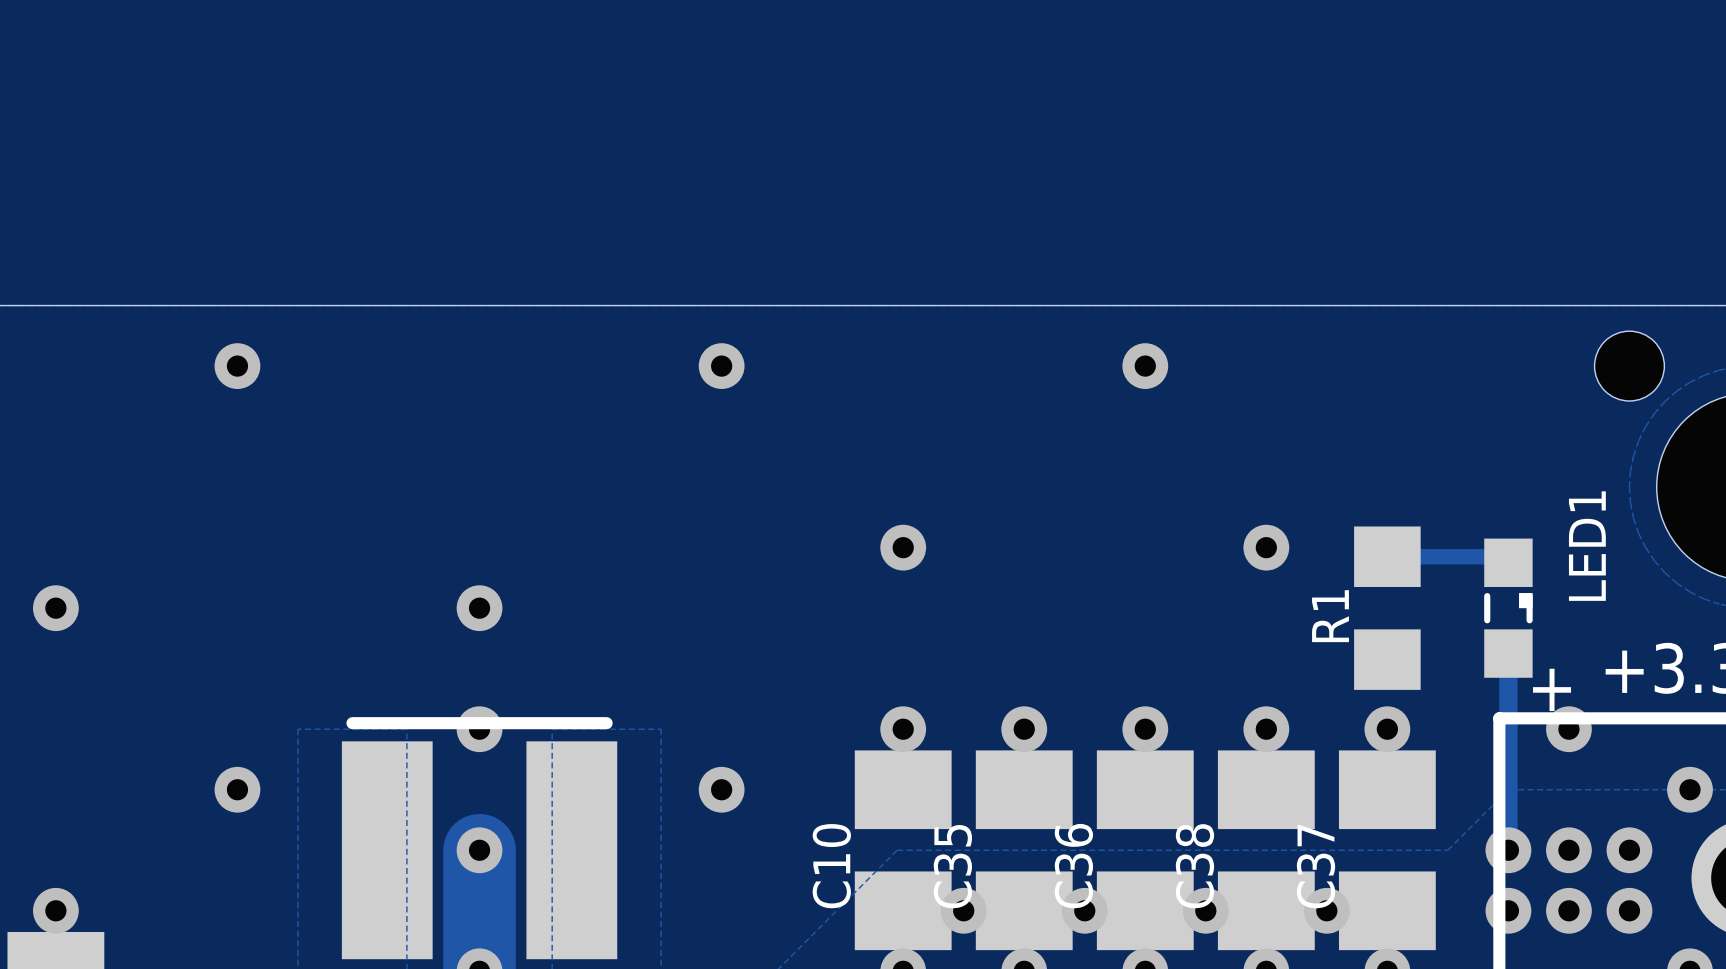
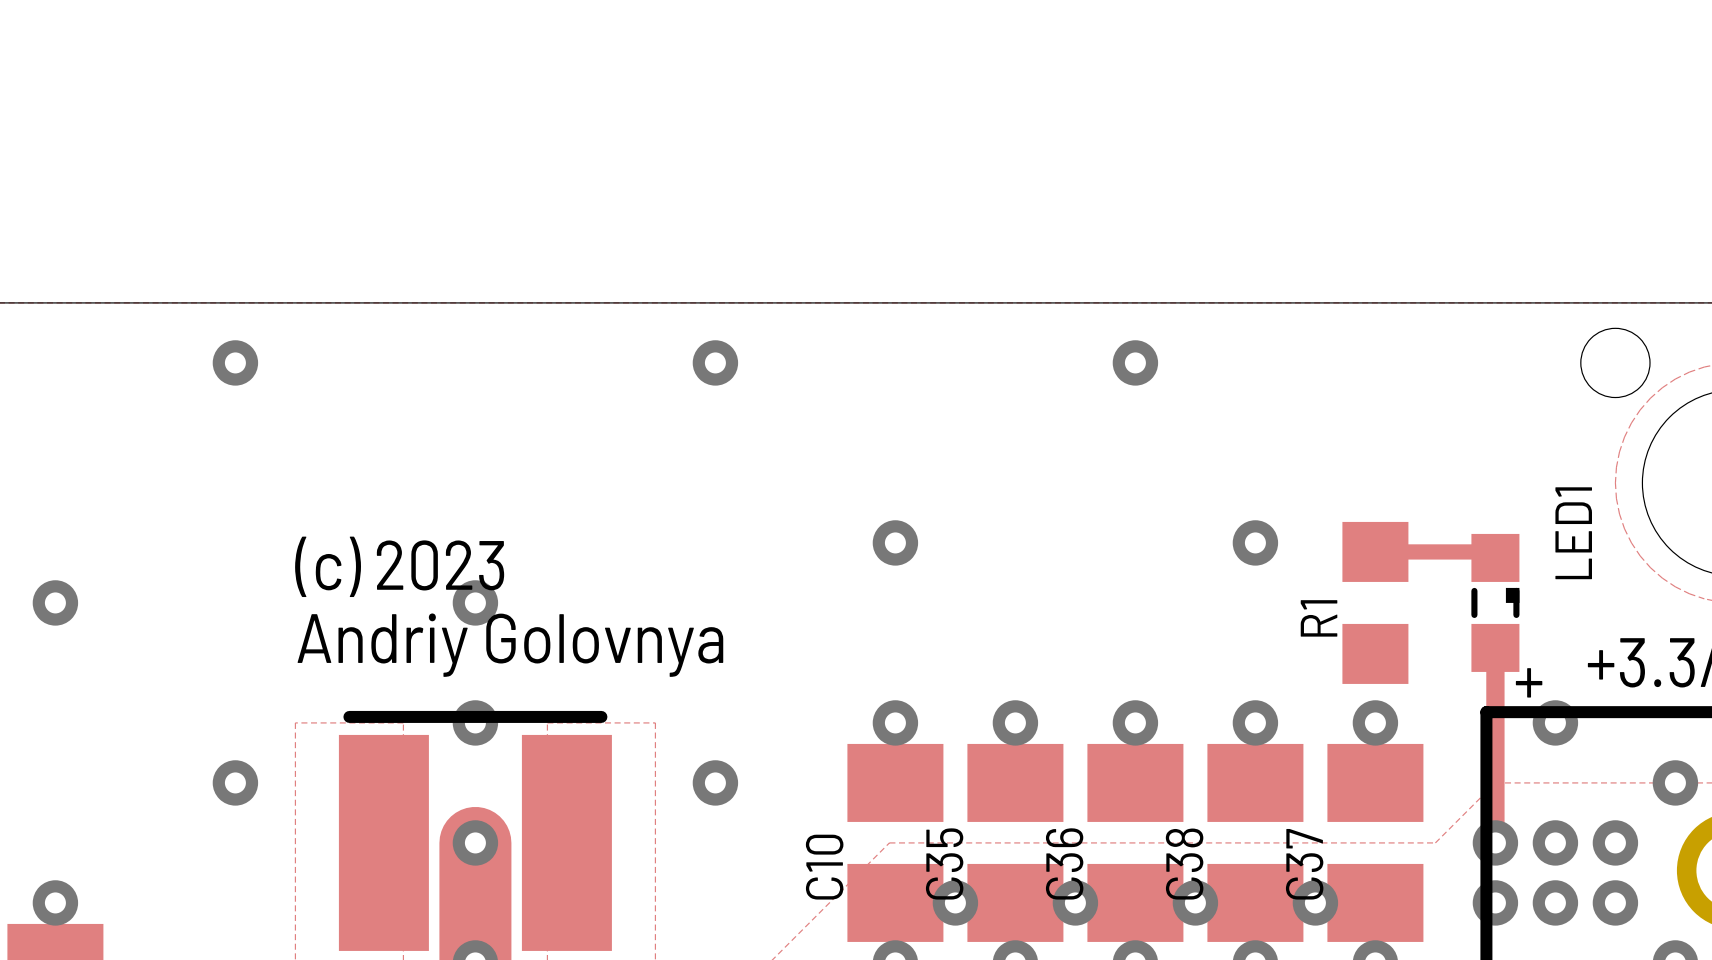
text: none -> (c) 2023 (399, 566)
text: none -> Andriy Golovnya (510, 645)

